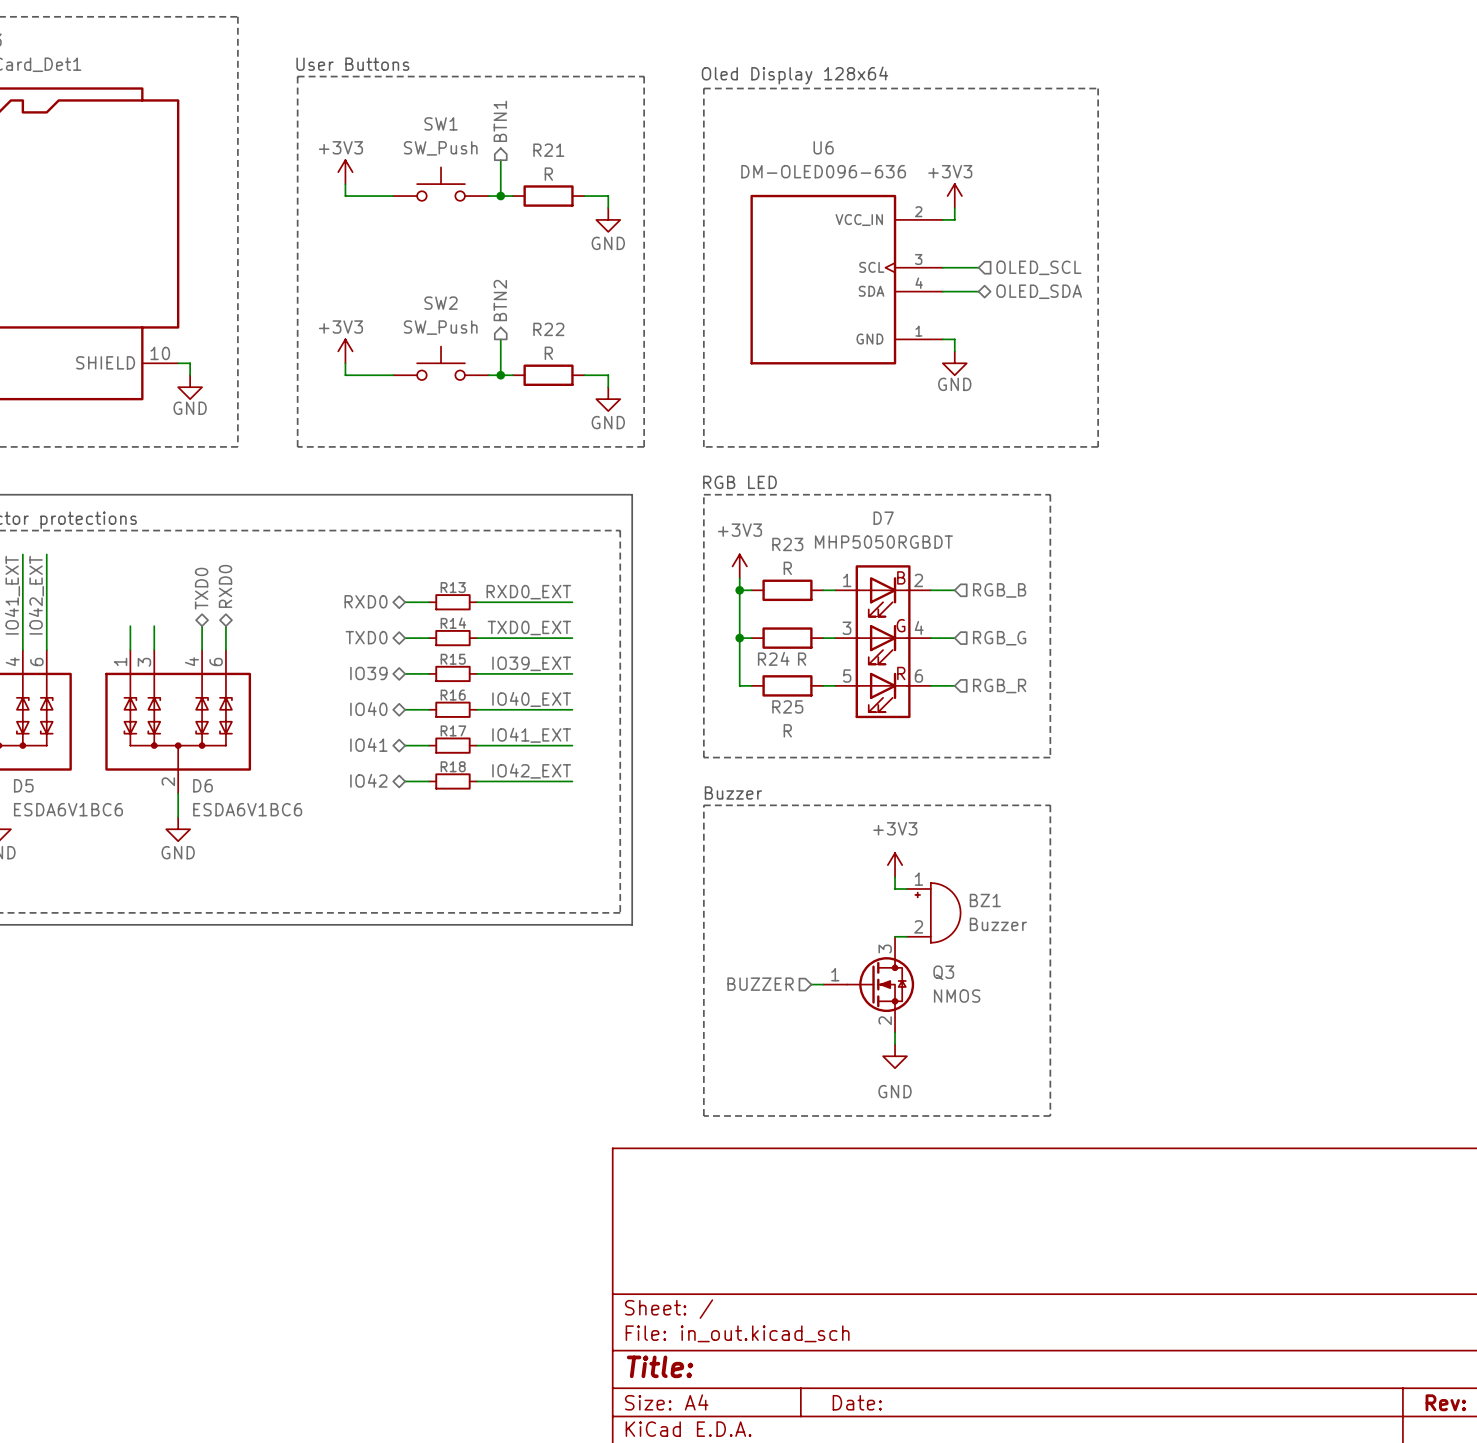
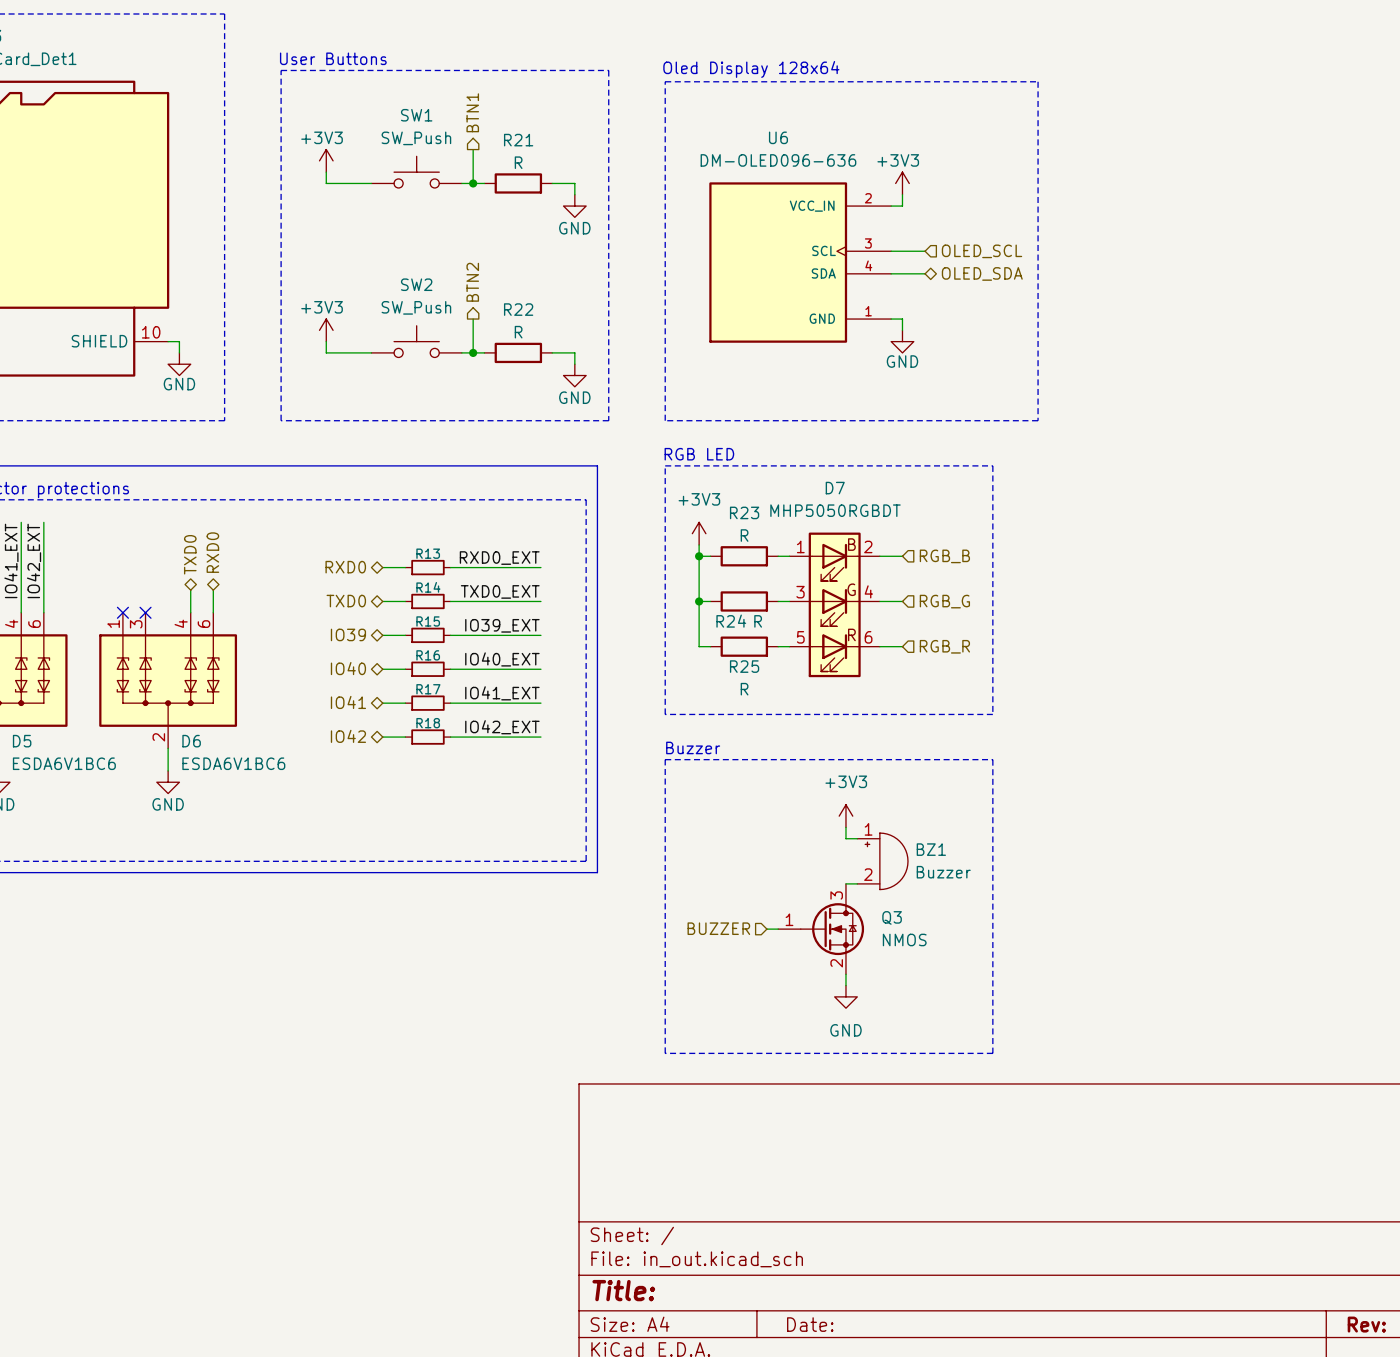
wire: (130, 626) (130, 650) -> none
wire: (154, 626) (154, 650) -> none
no-connect mark: none -> (122, 612)
no-connect mark: none -> (145, 612)

